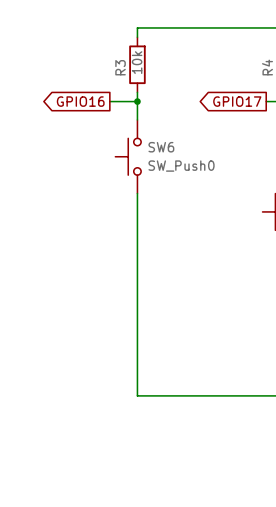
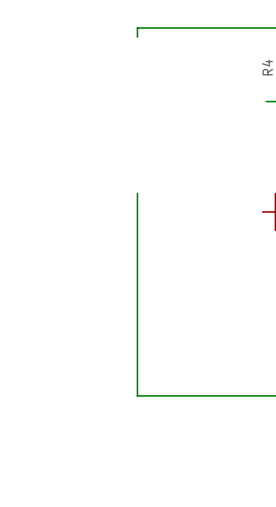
R3: 10k (137, 64) -> none
wire: (137, 92) (137, 119) -> none
global label: GPIO16 (80, 101) -> none
wire: (109, 101) (137, 101) -> none
junction: (137, 101) -> none
global label: GPIO17 (237, 101) -> none
SW6: SW_Push0 (128, 156) -> none

